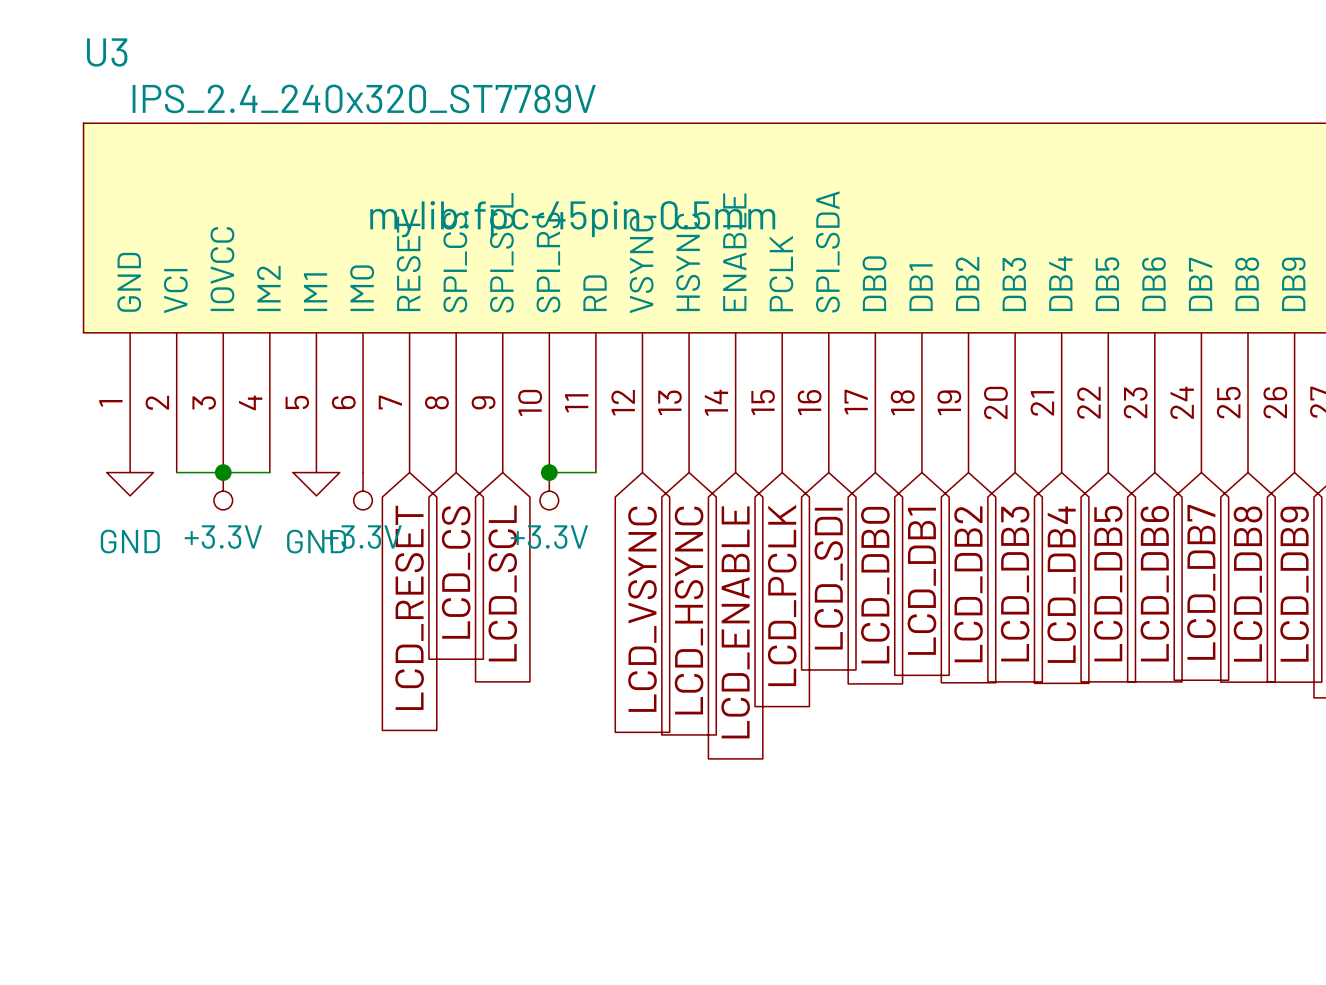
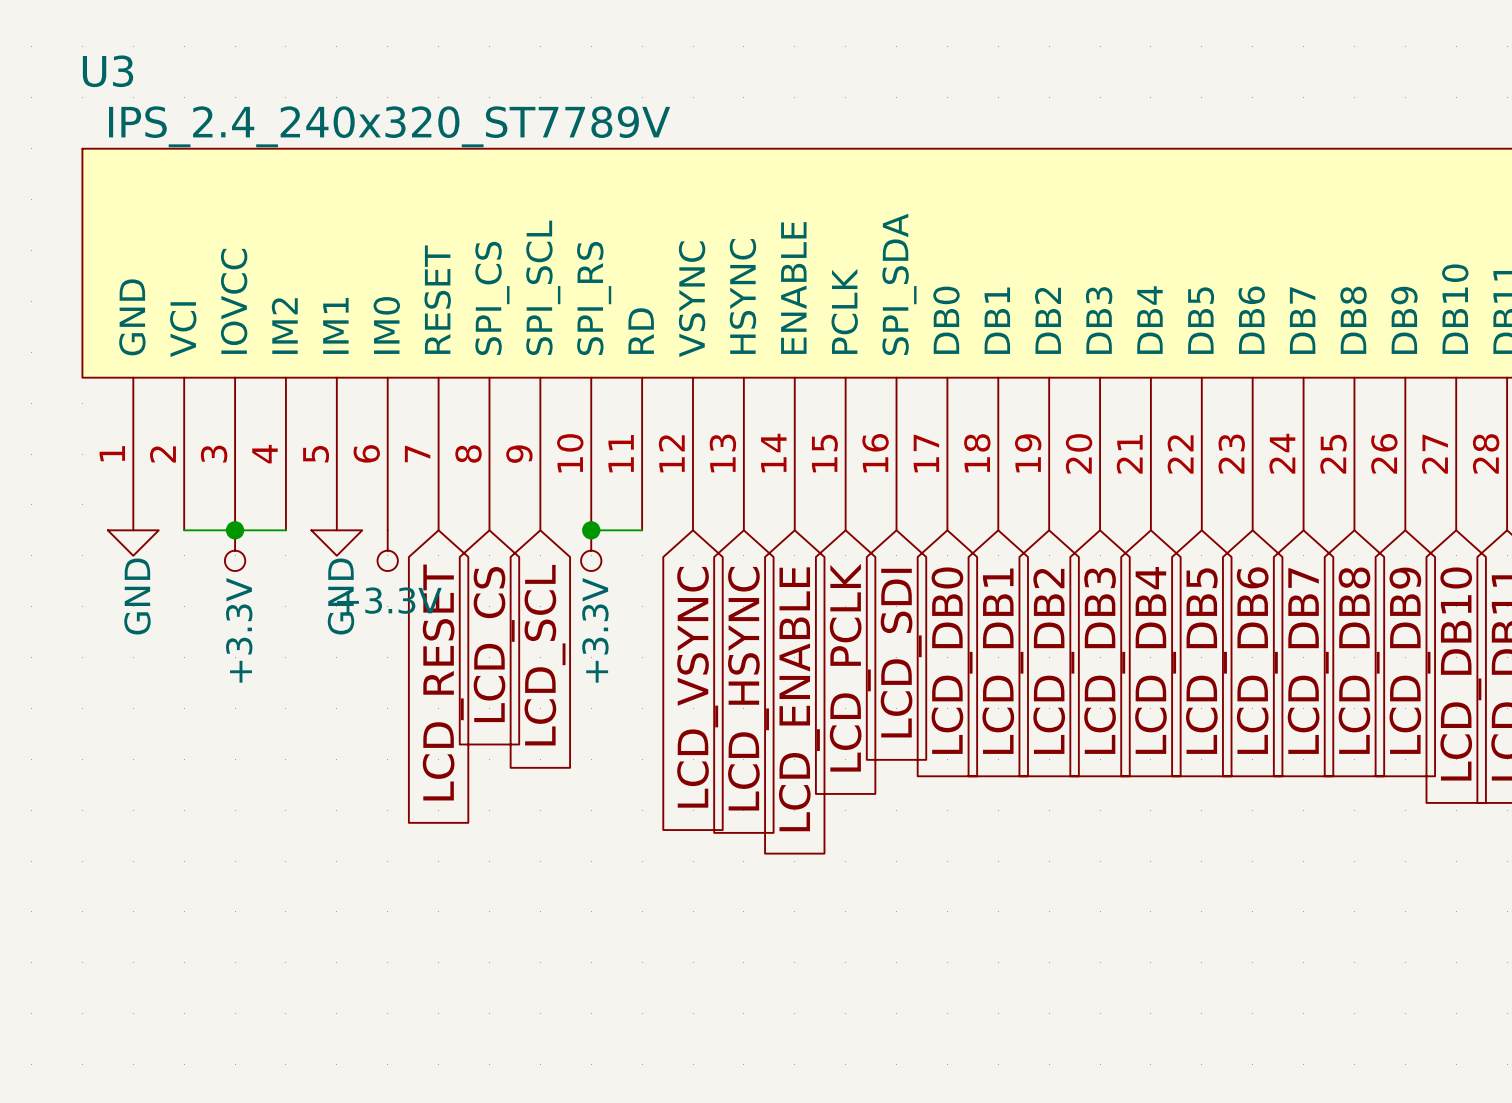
U3 text: mylib:fpc-45pin-0.5mm (572, 219) -> none
power symbol text rotation: 0° (223, 537) -> 90° counterclockwise (239, 630)
power symbol text rotation: 0° (549, 537) -> 90° counterclockwise (595, 630)
power symbol text rotation: 0° (130, 541) -> 90° counterclockwise (137, 596)
power symbol text rotation: 0° (316, 541) -> 90° counterclockwise (340, 596)

